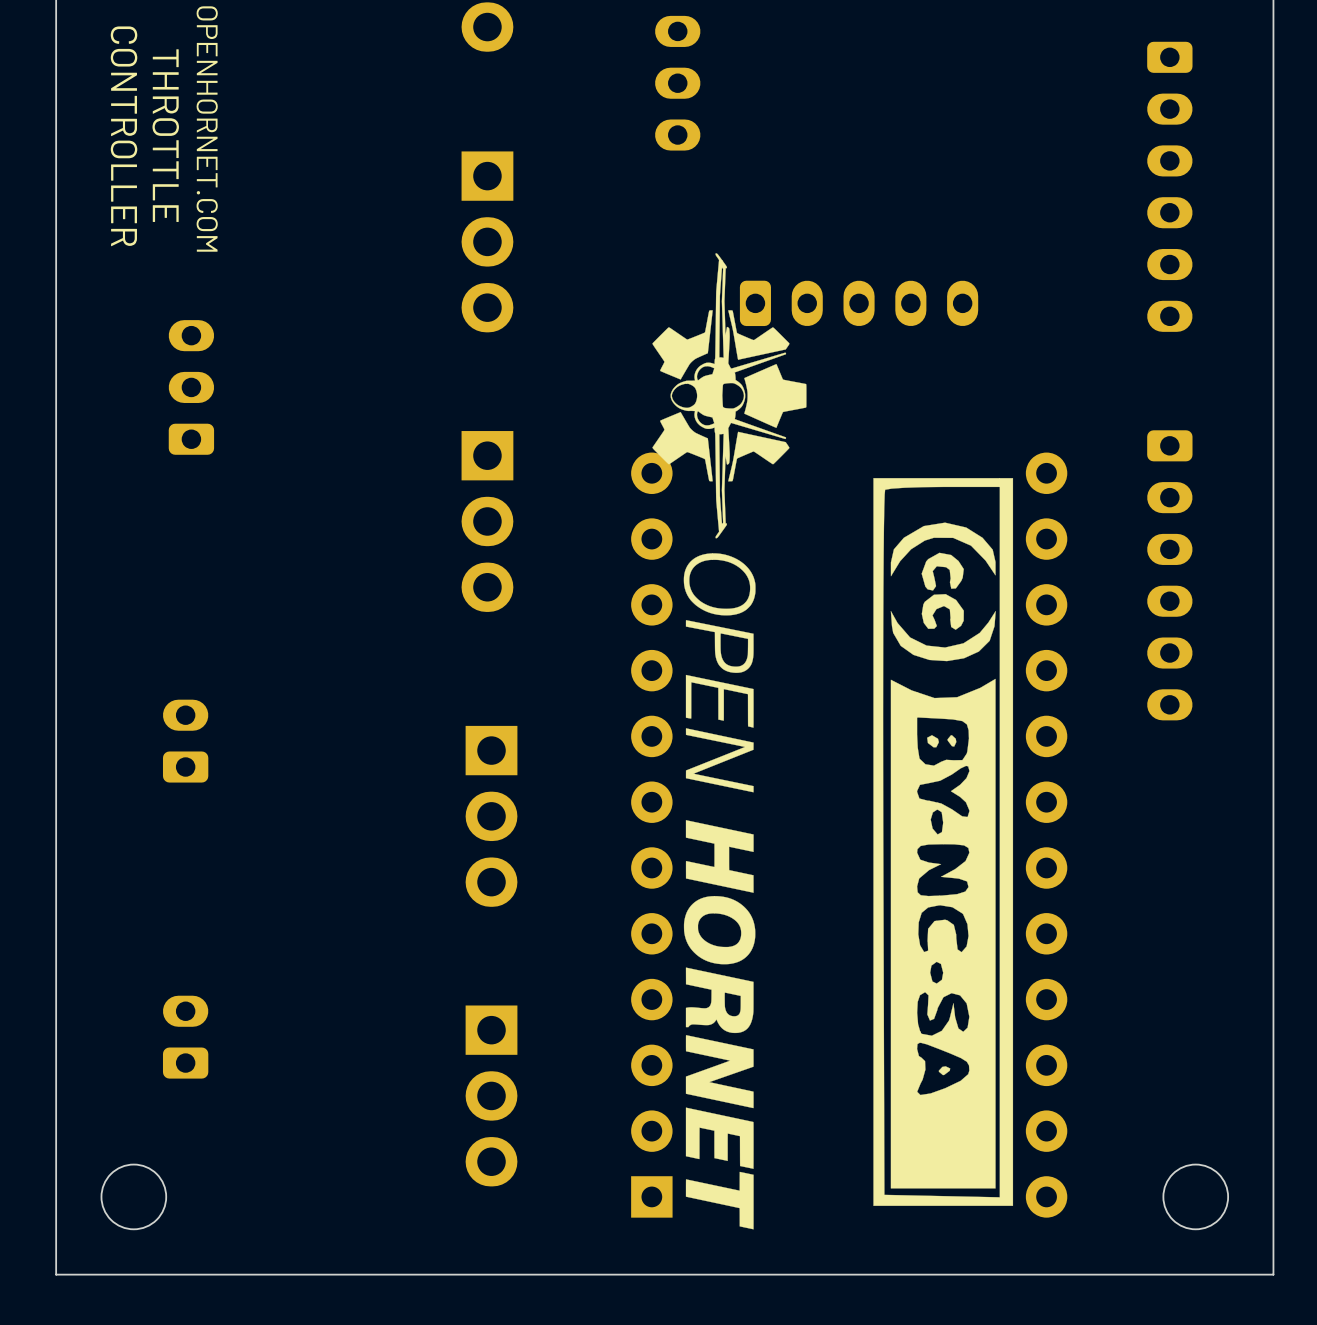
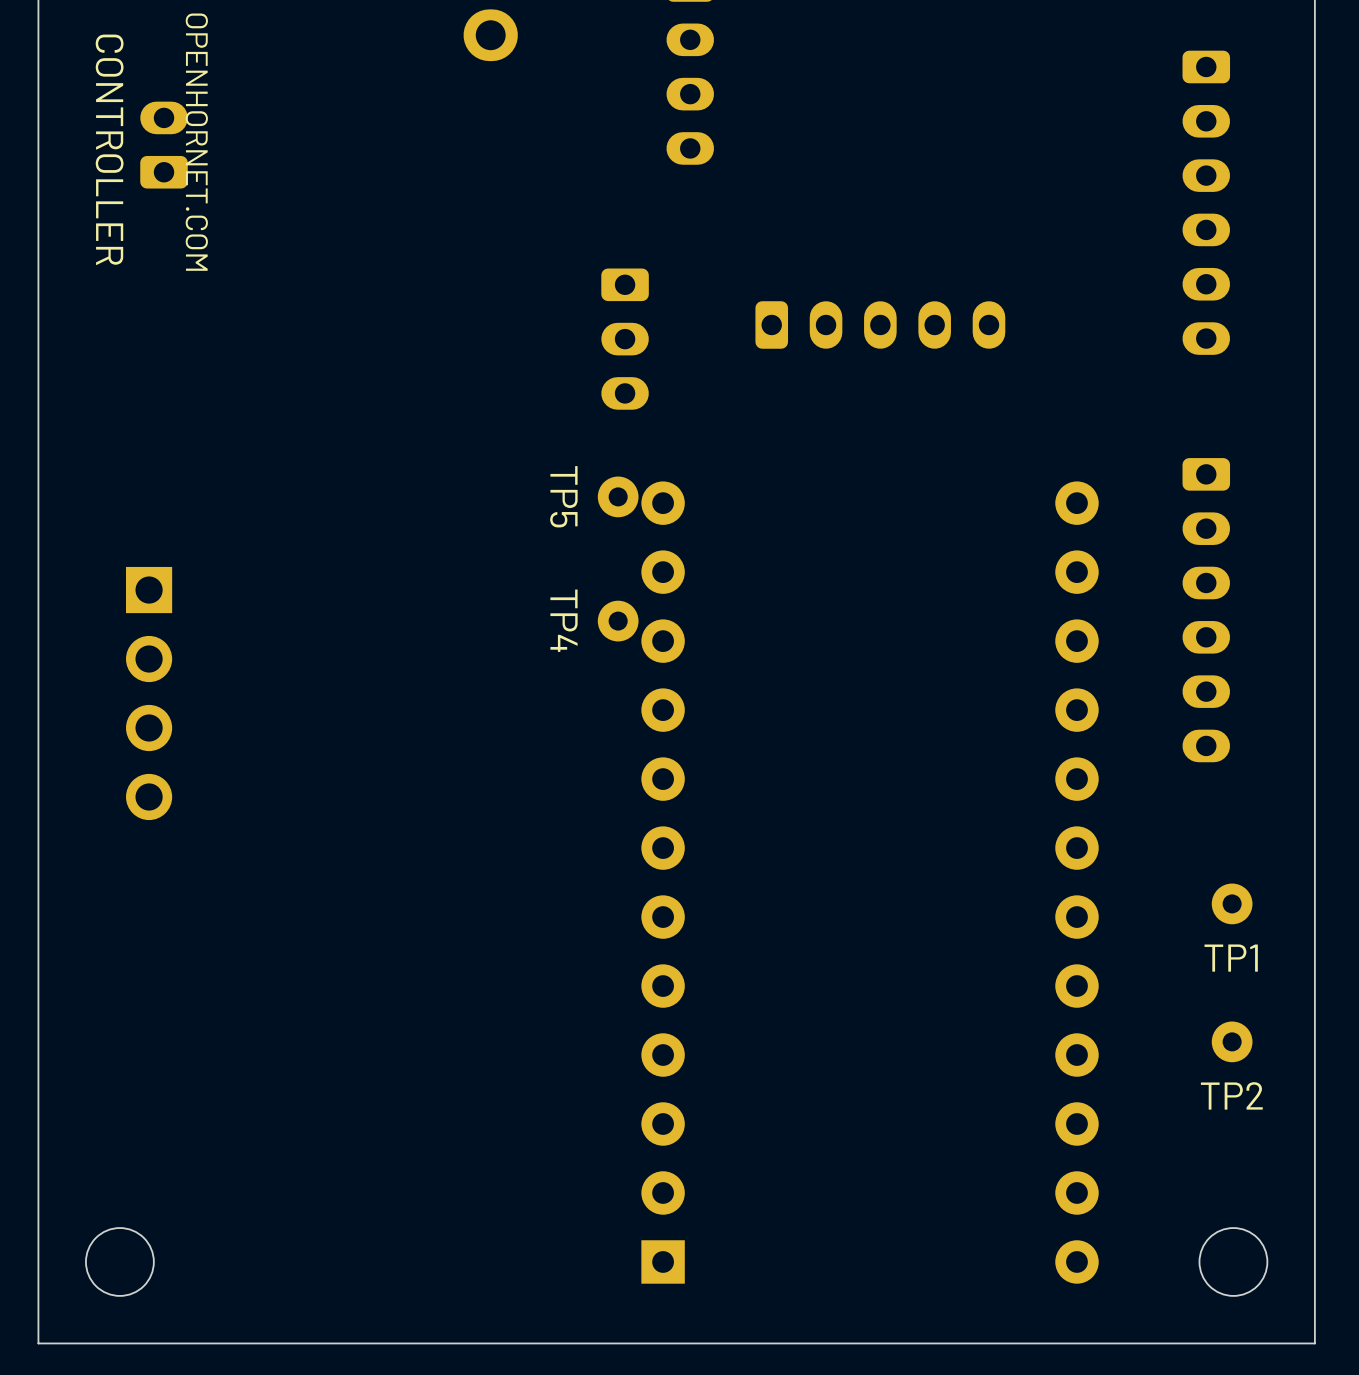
part: none -> (164, 145)
text: THROTTLE (165, 135) -> none
part: (487, 241) -> none
drawing: [652, 253, 807, 1230] -> none
part: none -> (625, 339)
part: (191, 387) -> none
TP5: none -> (618, 496)
drawing: [873, 478, 1014, 1206] -> none
part: (487, 521) -> none
TP4: none -> (618, 621)
part: none -> (149, 693)
part: (185, 741) -> none
part: (491, 816) -> none
TP1: none -> (1232, 903)
TP2: none -> (1232, 1041)
part: (185, 1037) -> none
part: (491, 1095) -> none

